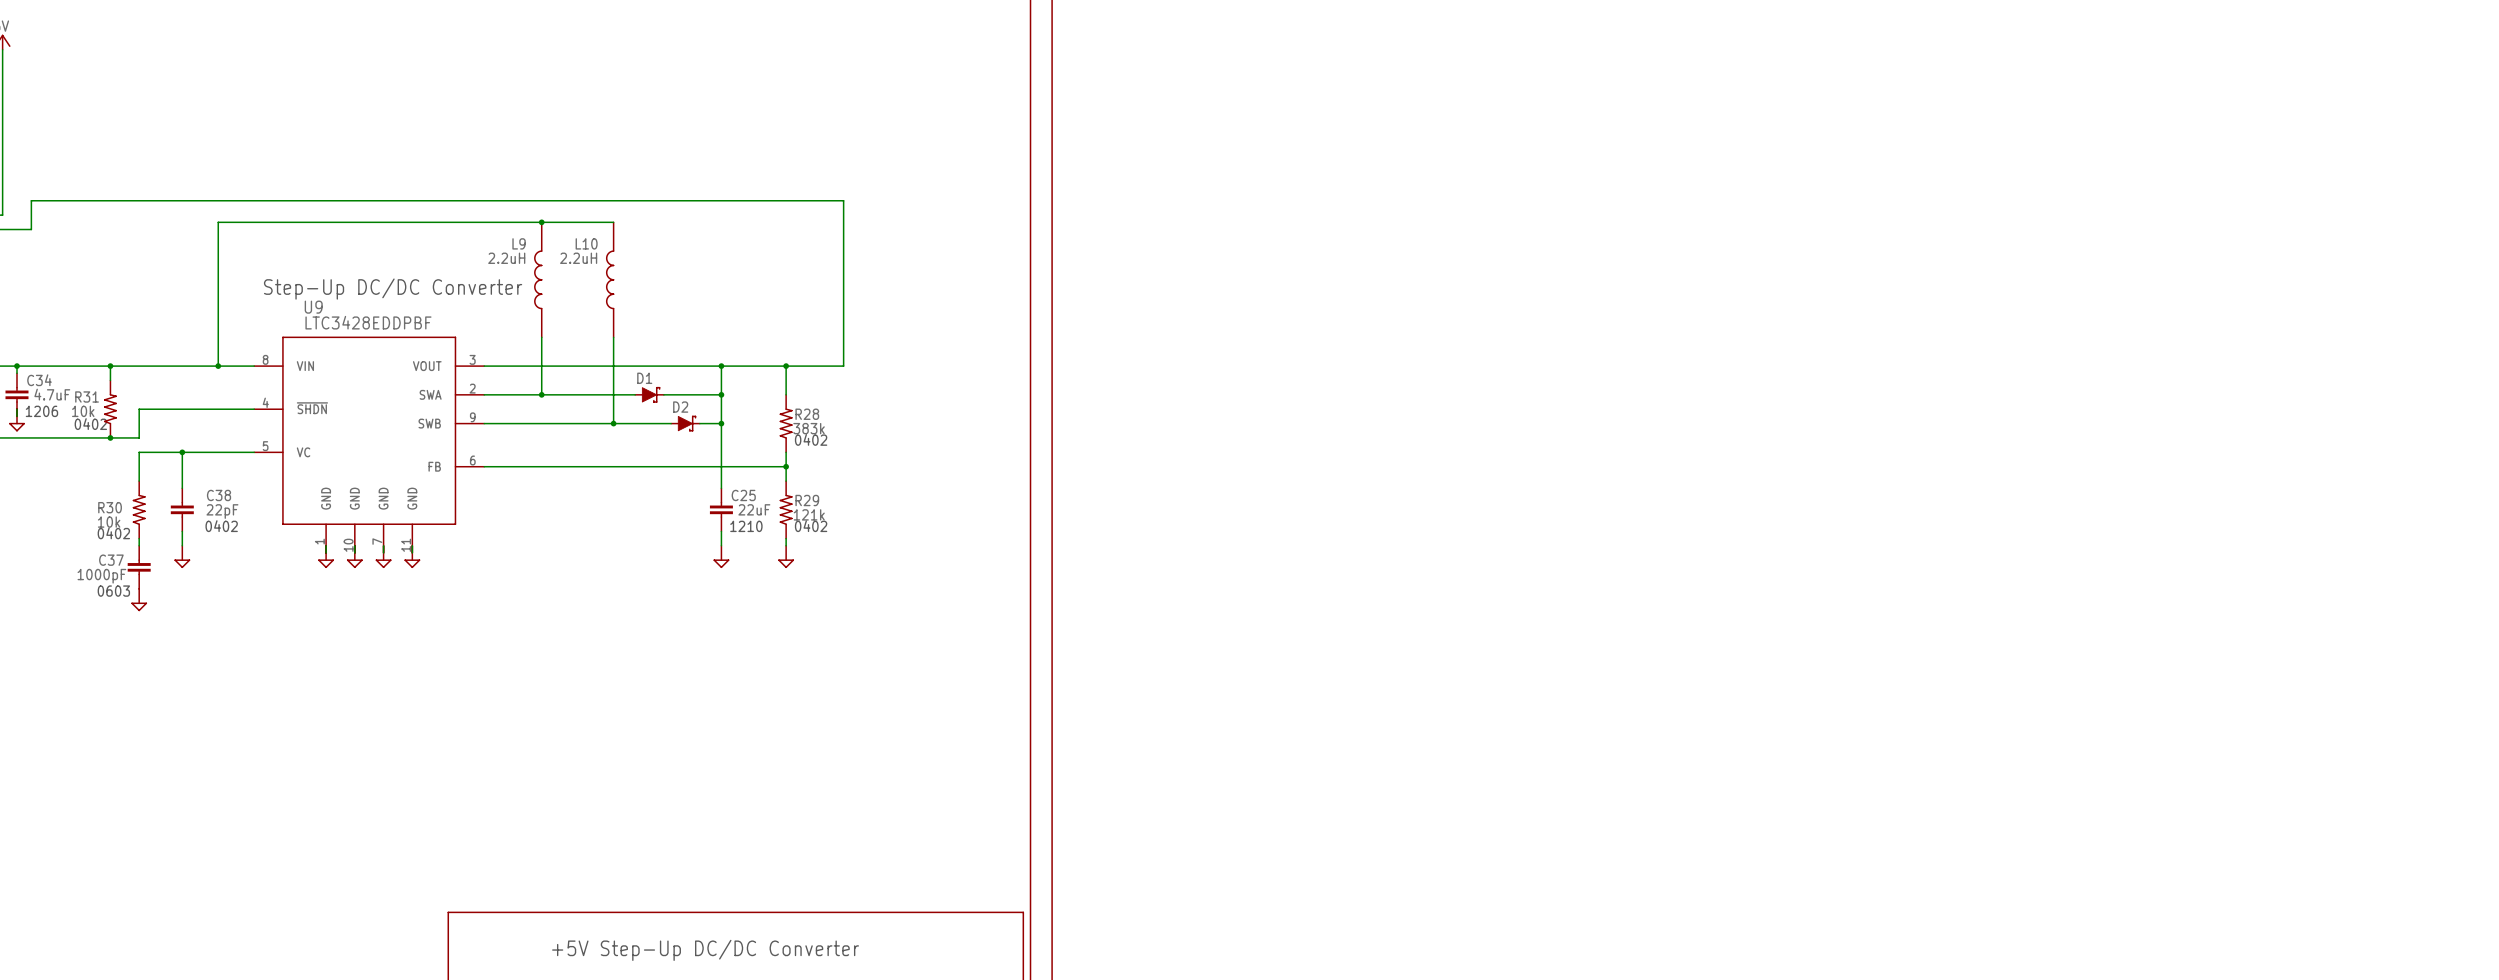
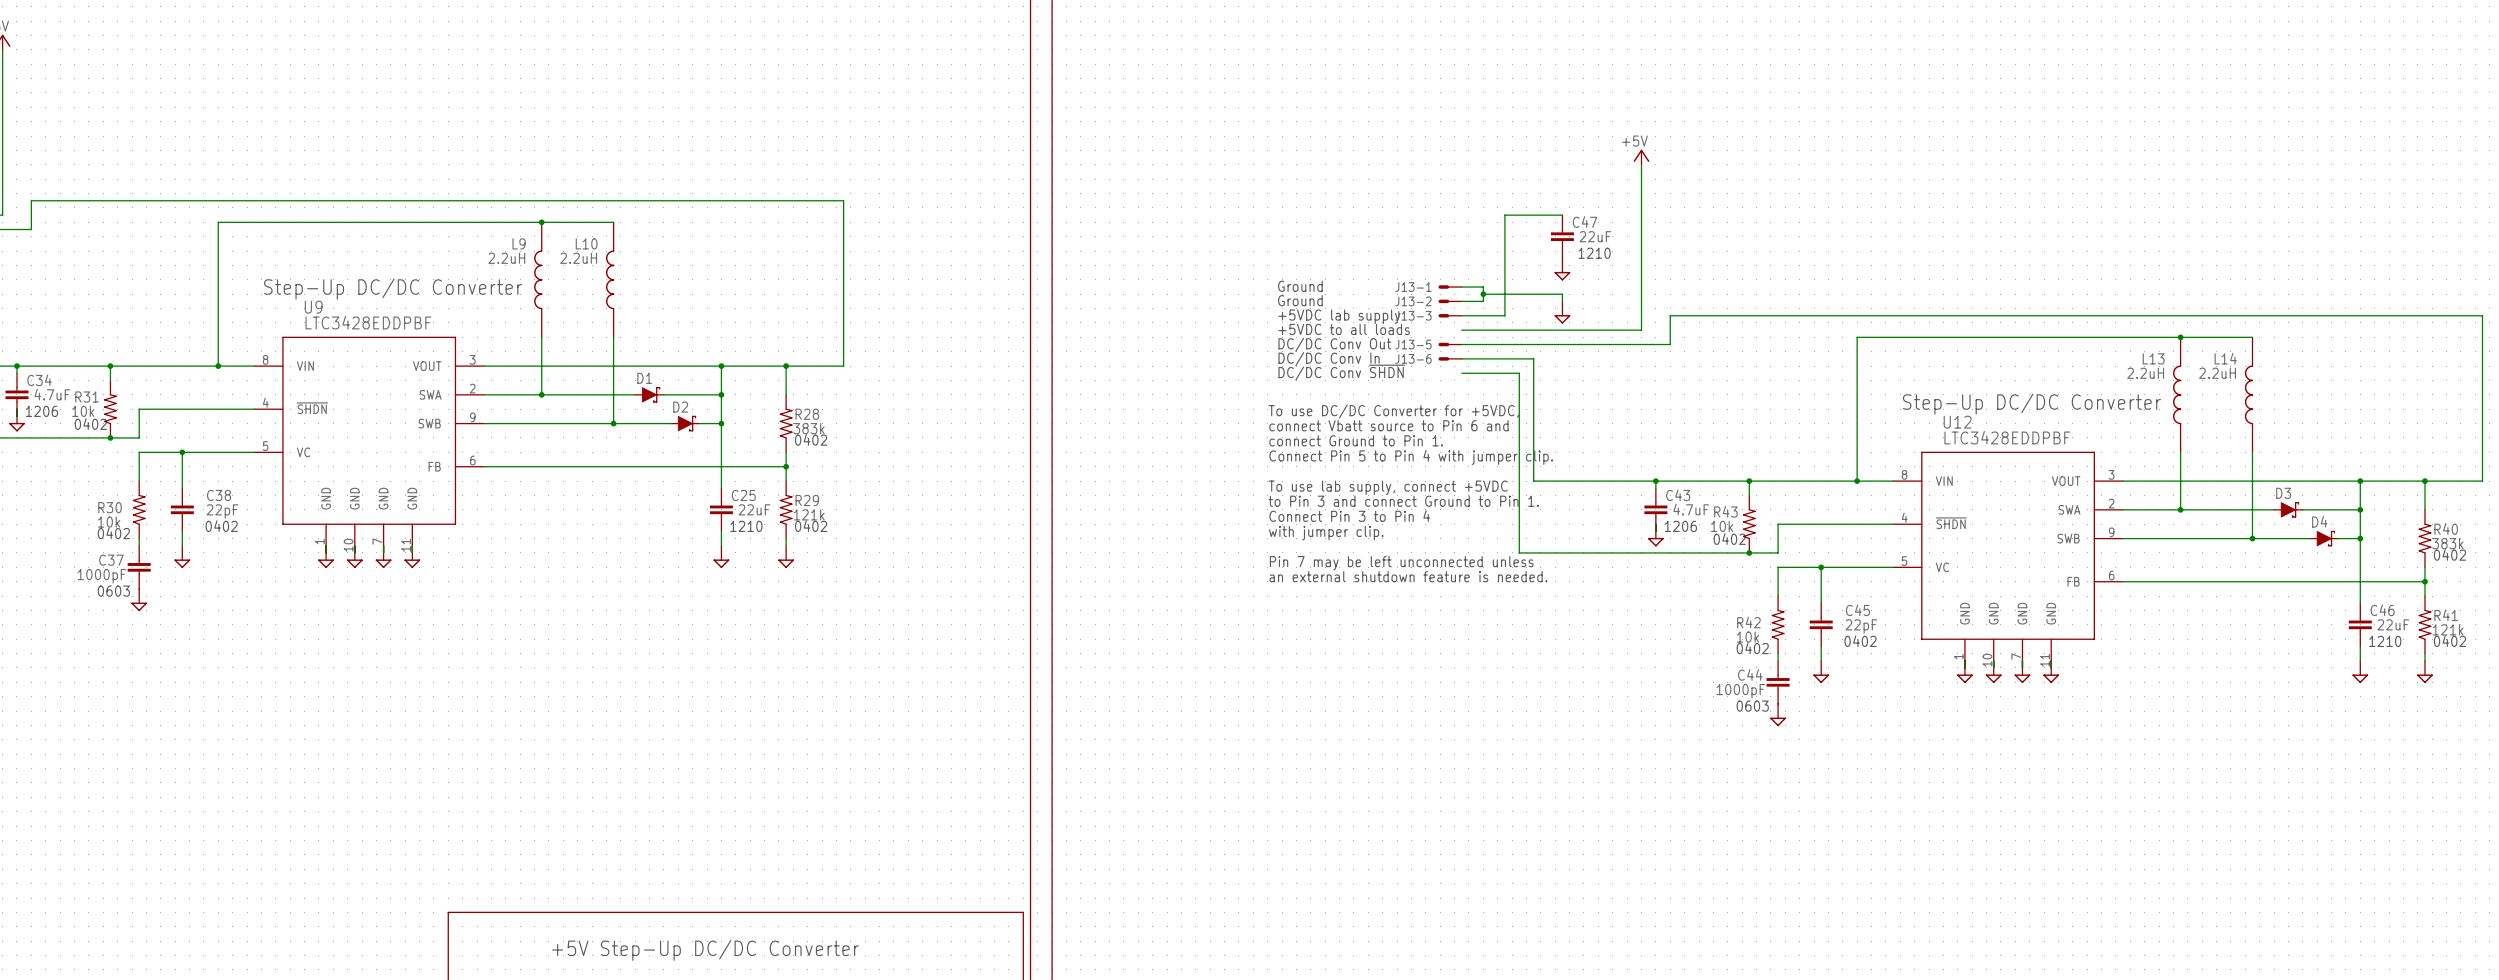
power symbol: none -> +5V (1641, 157)
wire: none -> (1641, 164) (1641, 330) (1461, 330)
wire: none -> (1562, 215) (1504, 215) (1504, 315) (1461, 315)
C47: none -> 22uF (1562, 236)
text: none -> 1210 (1594, 253)
power symbol: none -> (1562, 269)
text: none -> Ground (1300, 286)
J13-1: none -> (1450, 287)
wire: none -> (1461, 287) (1483, 287) (1483, 301) (1461, 301)
wire: none -> (1483, 294) (1562, 294) (1562, 301)
junction: none -> (1483, 294)
text: none -> Ground (1300, 300)
J13-2: none -> (1450, 301)
power symbol: none -> (1562, 312)
J13-3: none -> (1450, 315)
text: none -> +5VDC lab supply (1339, 316)
text: none -> +5VDC to all loads (1344, 329)
junction: none -> (2180, 337)
wire: none -> (2252, 337) (1857, 337) (1857, 481)
text: none -> DC/DC Conv Out (1334, 344)
J13-5: none -> (1450, 344)
wire: none -> (1461, 344) (1670, 344) (1670, 315) (2482, 315) (2482, 481) (2123, 481)
J13-6: none -> (1450, 358)
wire: none -> (1461, 358) (1533, 358) (1533, 481) (1893, 481)
text: none -> DC/DC Conv In (1329, 359)
text: none -> DC/DC Conv ~{SHDN} (1341, 372)
wire: none -> (1461, 373) (1519, 373) (1519, 552) (1778, 552) (1778, 524) (1893, 524)
L13: none -> 2.2uH (2177, 394)
L14: none -> 2.2uH (2249, 394)
text: none -> Step-Up DC/DC Converter (2031, 404)
text: none -> To use DC/DC Converter for +5VDC, (1393, 411)
text: none -> connect Vbatt source to Pin 6 and (1389, 425)
text: none -> connect Ground to Pin 1. (1356, 440)
wire: none -> (2180, 452) (2180, 509)
wire: none -> (2252, 452) (2252, 538)
text: none -> Connect Pin 5 to Pin 4 with jumper clip. (1411, 457)
wire: none -> (1655, 481) (1655, 488)
junction: none -> (1655, 481)
wire: none -> (1749, 481) (1749, 495)
junction: none -> (1749, 481)
junction: none -> (1857, 481)
wire: none -> (2360, 481) (2360, 603)
junction: none -> (2360, 481)
wire: none -> (2424, 481) (2424, 509)
junction: none -> (2424, 481)
text: none -> To use lab supply, connect +5VDC (1388, 487)
text: none -> to Pin 3 and connect Ground to Pin 1. (1403, 501)
C43: none -> 4.7uF (1655, 509)
wire: none -> (2123, 509) (2274, 509)
junction: none -> (2180, 509)
D3: none -> (2288, 509)
wire: none -> (2302, 509) (2360, 509)
junction: none -> (2360, 509)
text: none -> Connect Pin 3 to Pin 4 (1349, 516)
wire: none -> (1655, 524) (1655, 531)
R43: none -> 10k (1749, 524)
text: none -> 1206 (1680, 526)
text: none -> with jumper clip. (1326, 533)
power symbol: none -> (1655, 535)
wire: none -> (2123, 538) (2309, 538)
junction: none -> (2252, 538)
D4: none -> (2324, 538)
wire: none -> (2338, 538) (2360, 538)
junction: none -> (2360, 538)
R40: none -> 383k (2424, 538)
text: none -> 0402 (1729, 539)
junction: none -> (1749, 552)
text: none -> 0402 (2449, 554)
U12: none -> LTC3428EDDPBF (2008, 559)
text: none -> Pin 7 may be left unconnected unless (1401, 563)
wire: none -> (1821, 567) (1821, 603)
junction: none -> (1821, 567)
wire: none -> (1893, 567) (1778, 567) (1778, 596)
wire: none -> (2424, 567) (2424, 596)
text: none -> an external shutdown feature is needed. (1408, 576)
wire: none -> (2123, 581) (2424, 581)
junction: none -> (2424, 581)
R42: none -> 10k (1778, 624)
C45: none -> 22pF (1821, 624)
C46: none -> 22uF (2360, 624)
R41: none -> 121k (2424, 624)
text: none -> 0402 (1860, 641)
text: none -> 1210 (2385, 641)
text: none -> 0402 (2449, 641)
wire: none -> (1821, 646) (1821, 660)
wire: none -> (2360, 646) (2360, 660)
text: none -> 0402 (1752, 648)
wire: none -> (1778, 653) (1778, 660)
wire: none -> (2424, 653) (2424, 660)
wire: none -> (1964, 660) (1964, 667)
wire: none -> (1993, 660) (1993, 667)
wire: none -> (2022, 660) (2022, 667)
wire: none -> (2051, 660) (2051, 667)
power symbol: none -> (1821, 671)
power symbol: none -> (1964, 671)
power symbol: none -> (1993, 671)
power symbol: none -> (2022, 671)
power symbol: none -> (2051, 671)
power symbol: none -> (2360, 671)
power symbol: none -> (2424, 671)
C44: none -> 1000pF (1778, 682)
text: none -> 0603 (1752, 706)
power symbol: none -> (1778, 715)

